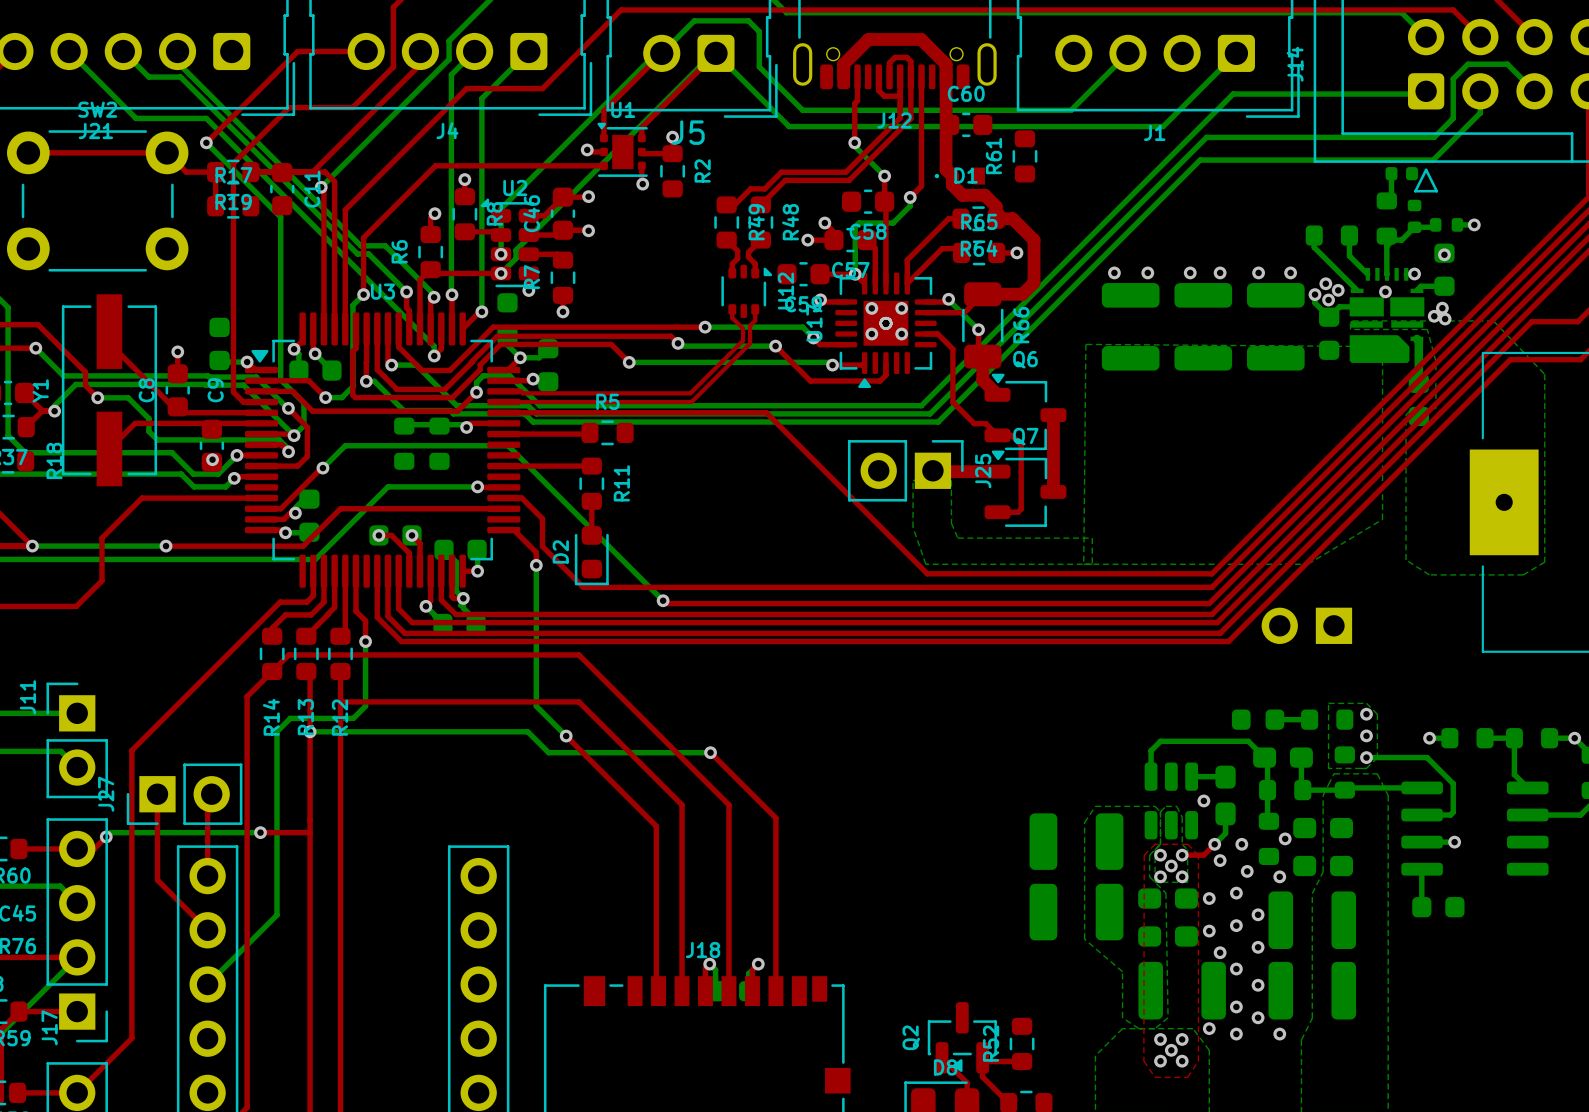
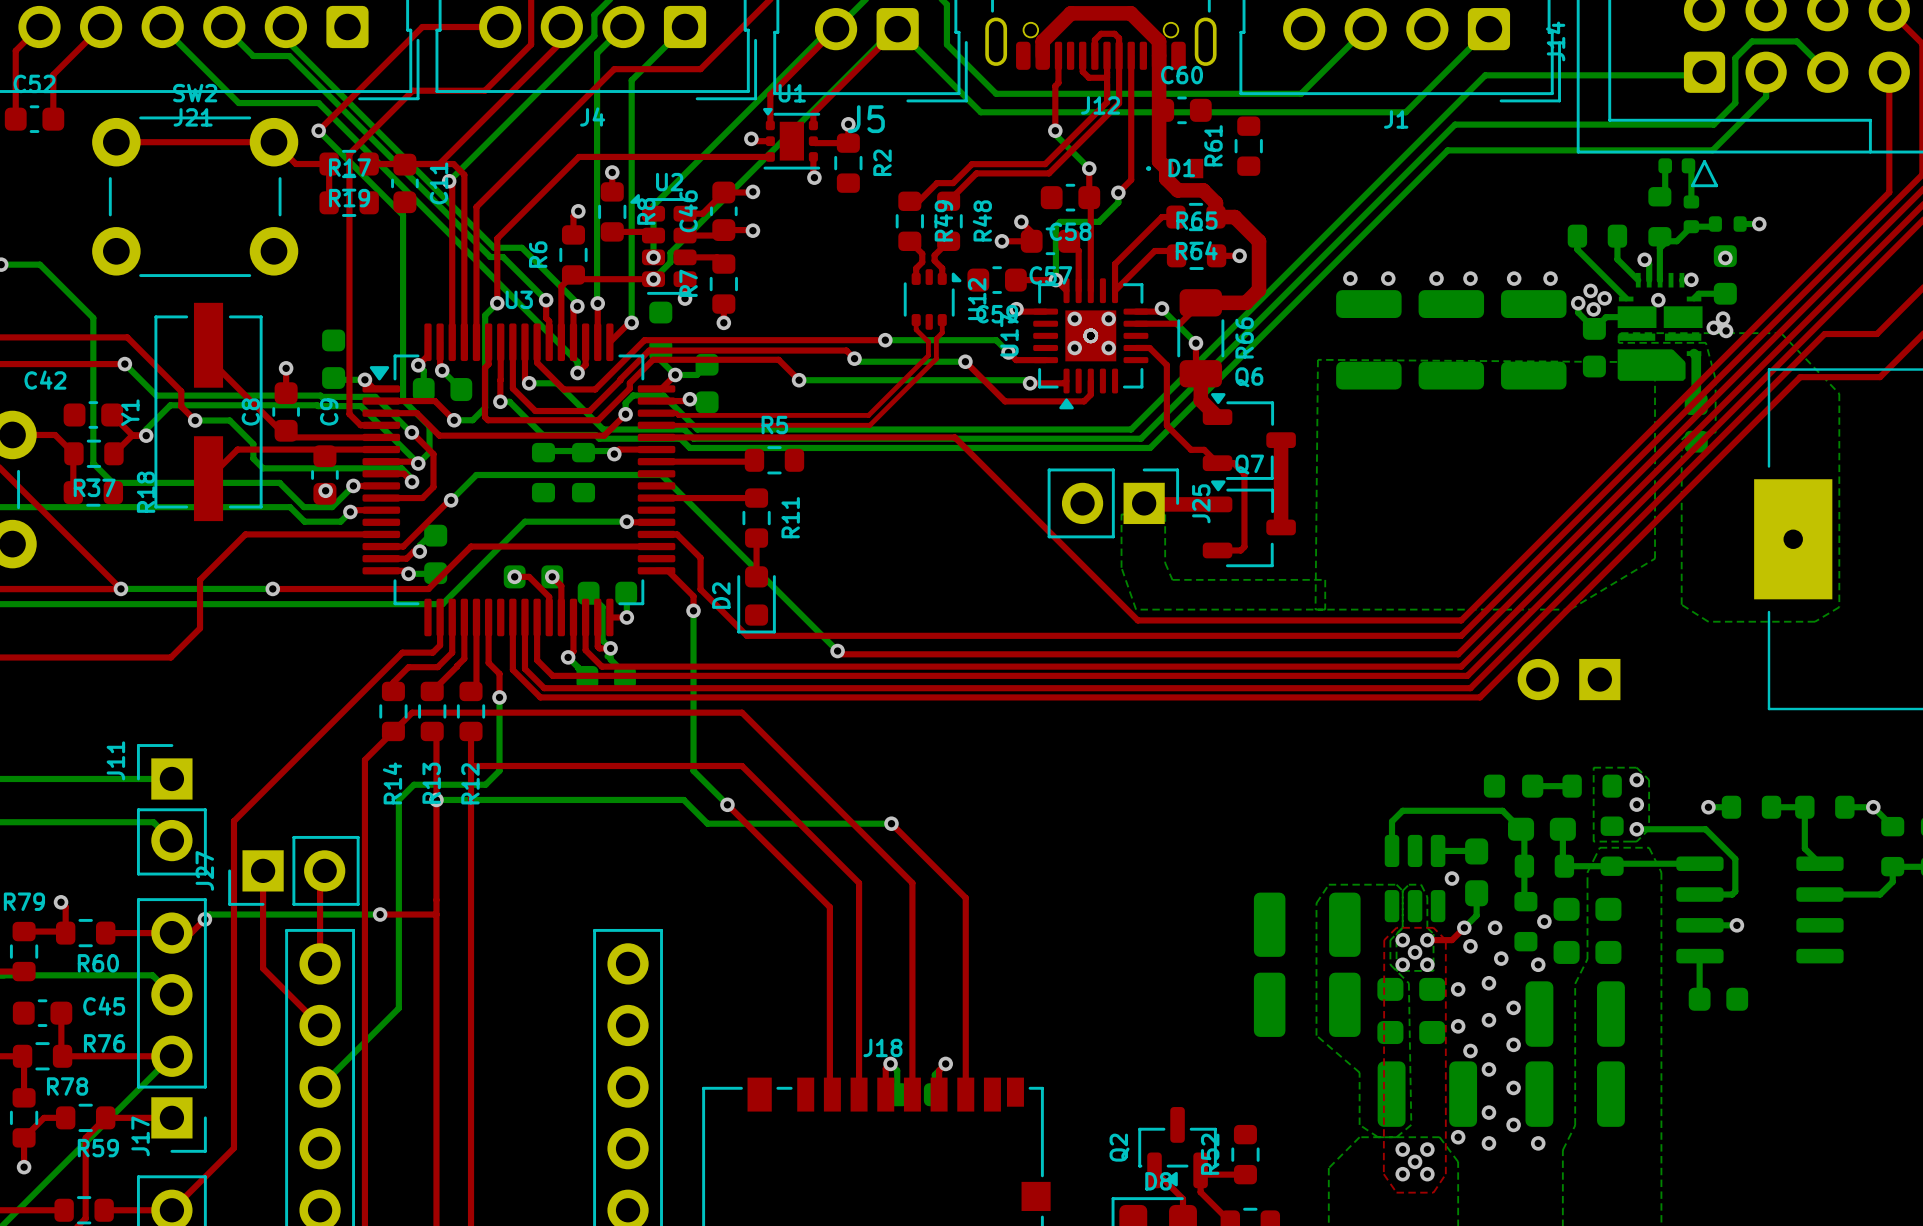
bottom track: none -> (1688, 165) (1691, 168) (1691, 201)
bottom track: none -> (1644, 259) (1649, 264) (1649, 280)
via: none -> (1644, 259)

